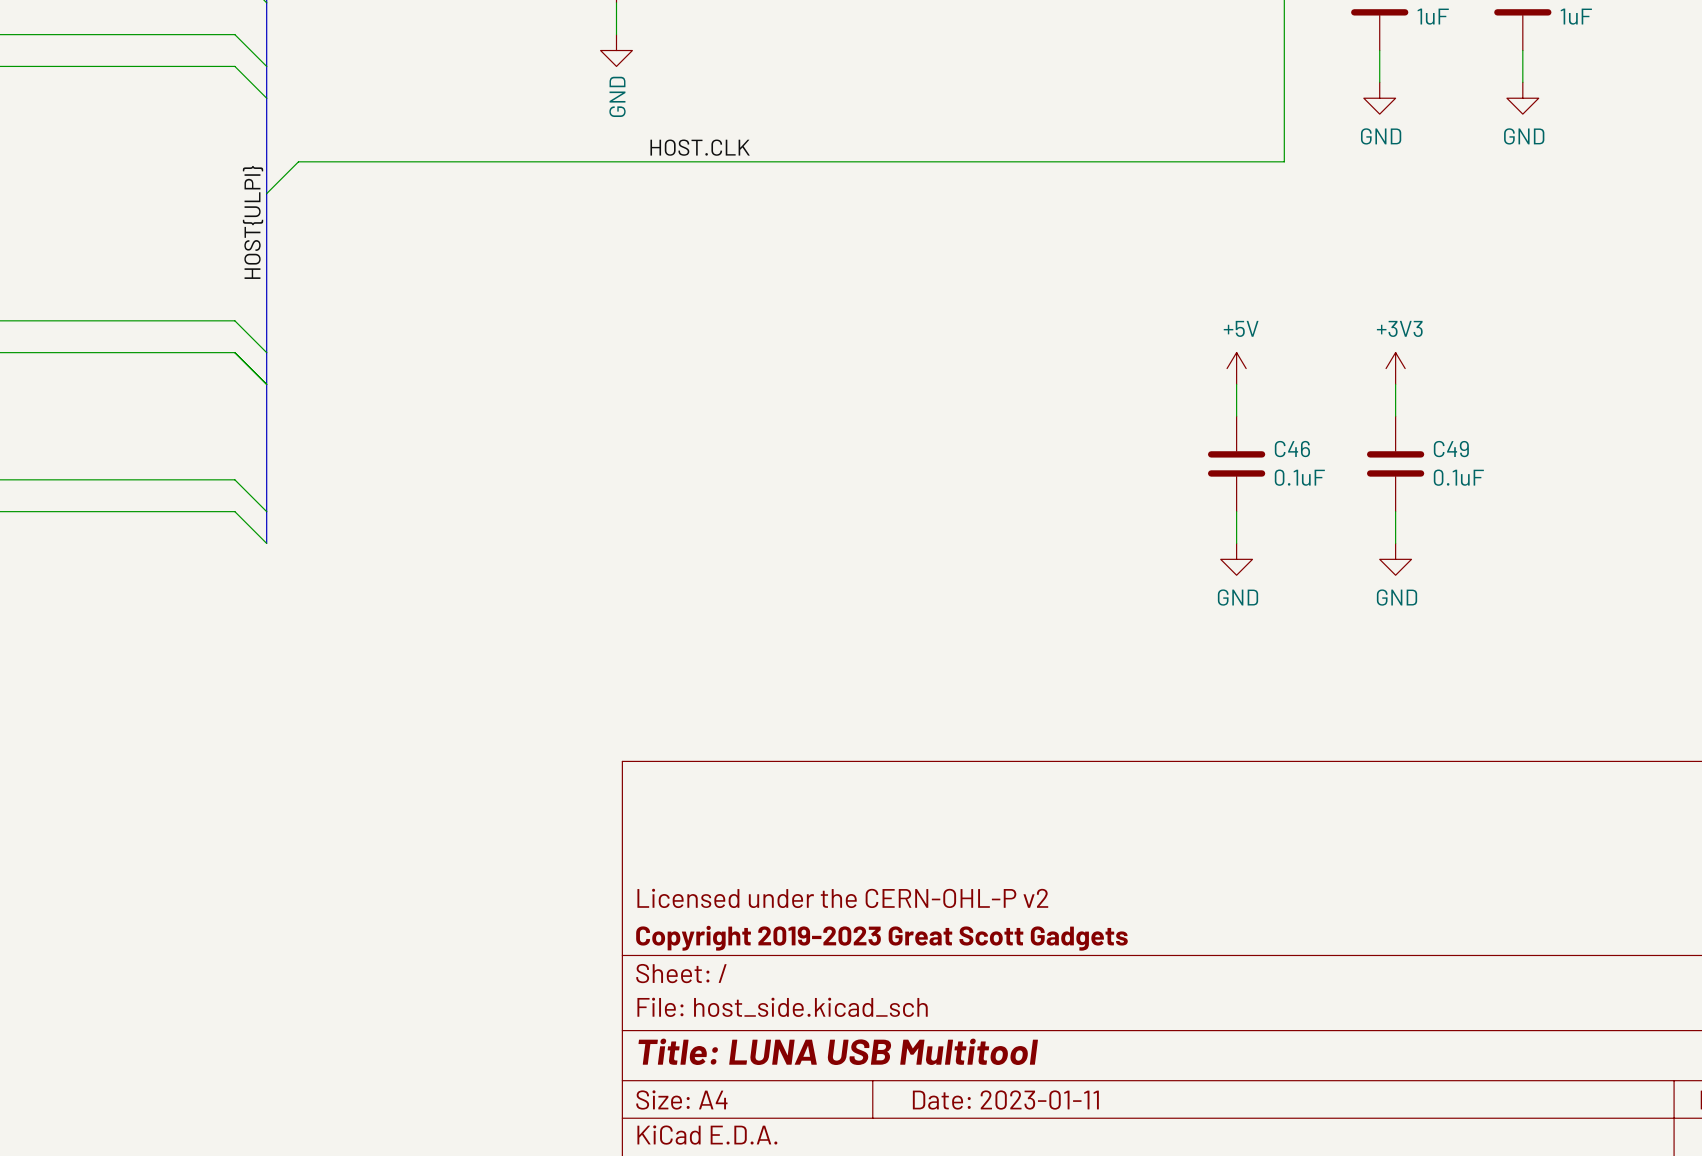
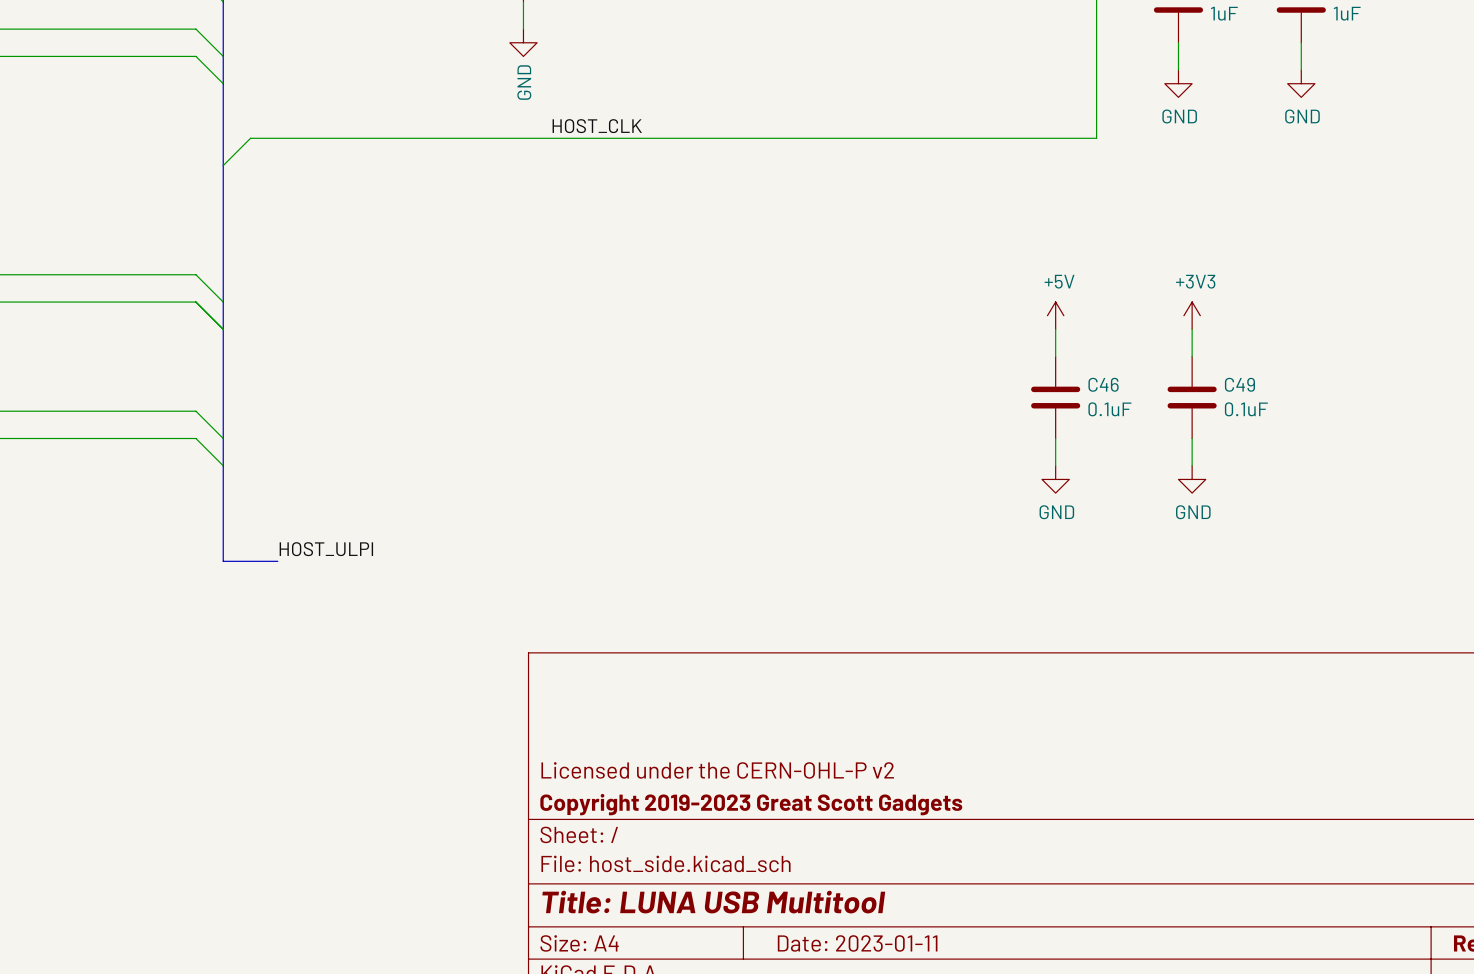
label: HOST.CLK (700, 147) -> HOST_CLK (597, 126)
label: HOST{ULPI} (253, 222) -> none
bus: none -> (223, 465) (223, 561) (277, 561)
label: none -> HOST_ULPI (326, 549)

